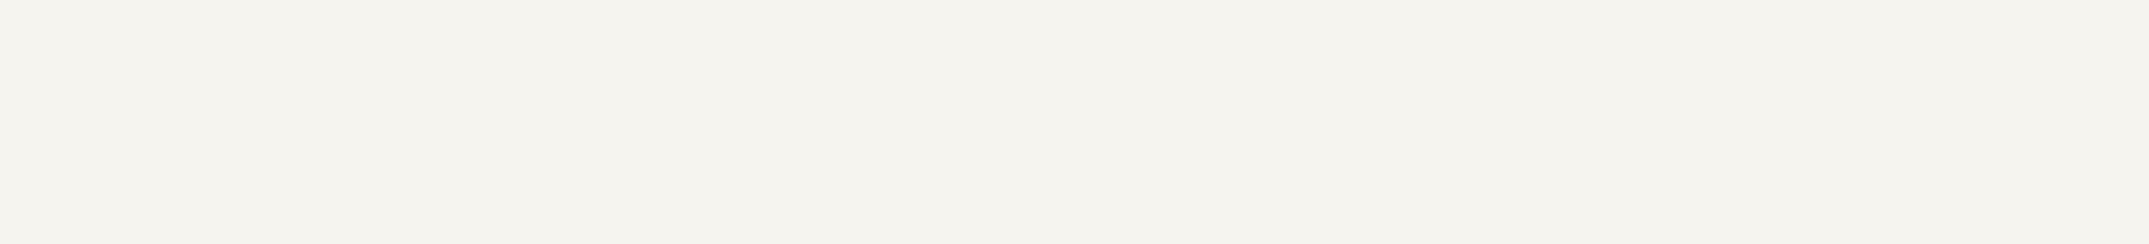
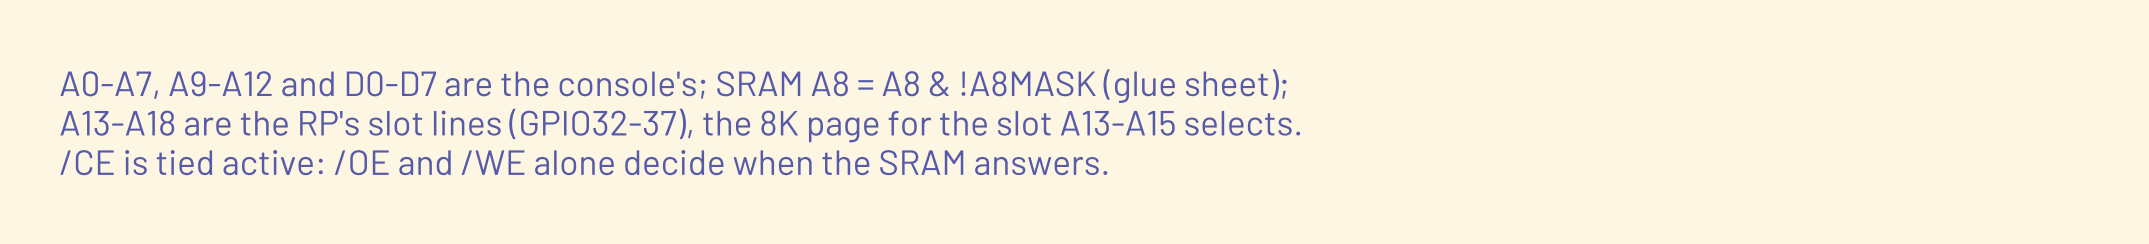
text: none -> A0-A7, A9-A12 and D0-D7 are the console's; SRAM A8 = A8 & !A8MASK (glue sheet); (673, 86)
text: none -> A13-A18 are the RP's slot lines (GPIO32-37), the 8K page for the slot A13-A15 selects. (680, 125)
text: none -> /CE is tied active: /OE and /WE alone decide when the SRAM answers. (583, 162)

